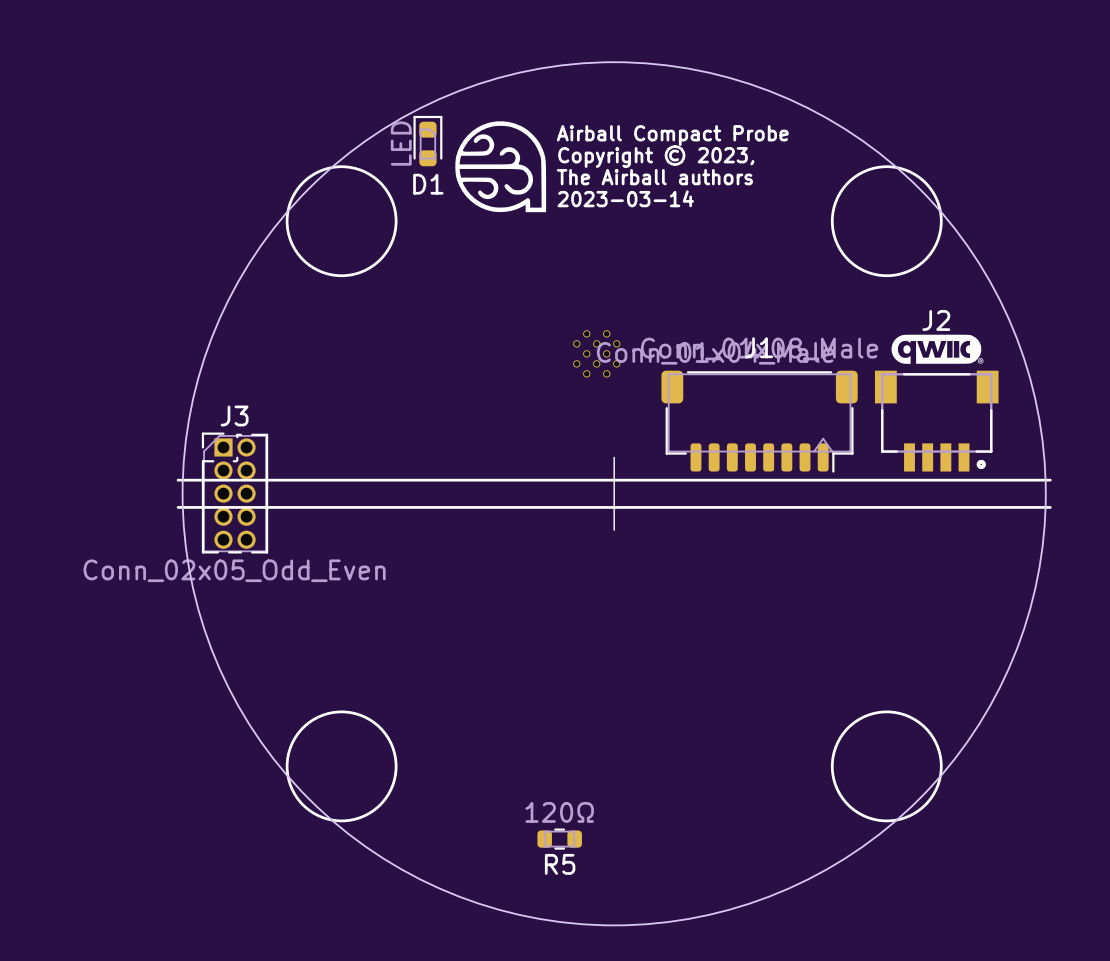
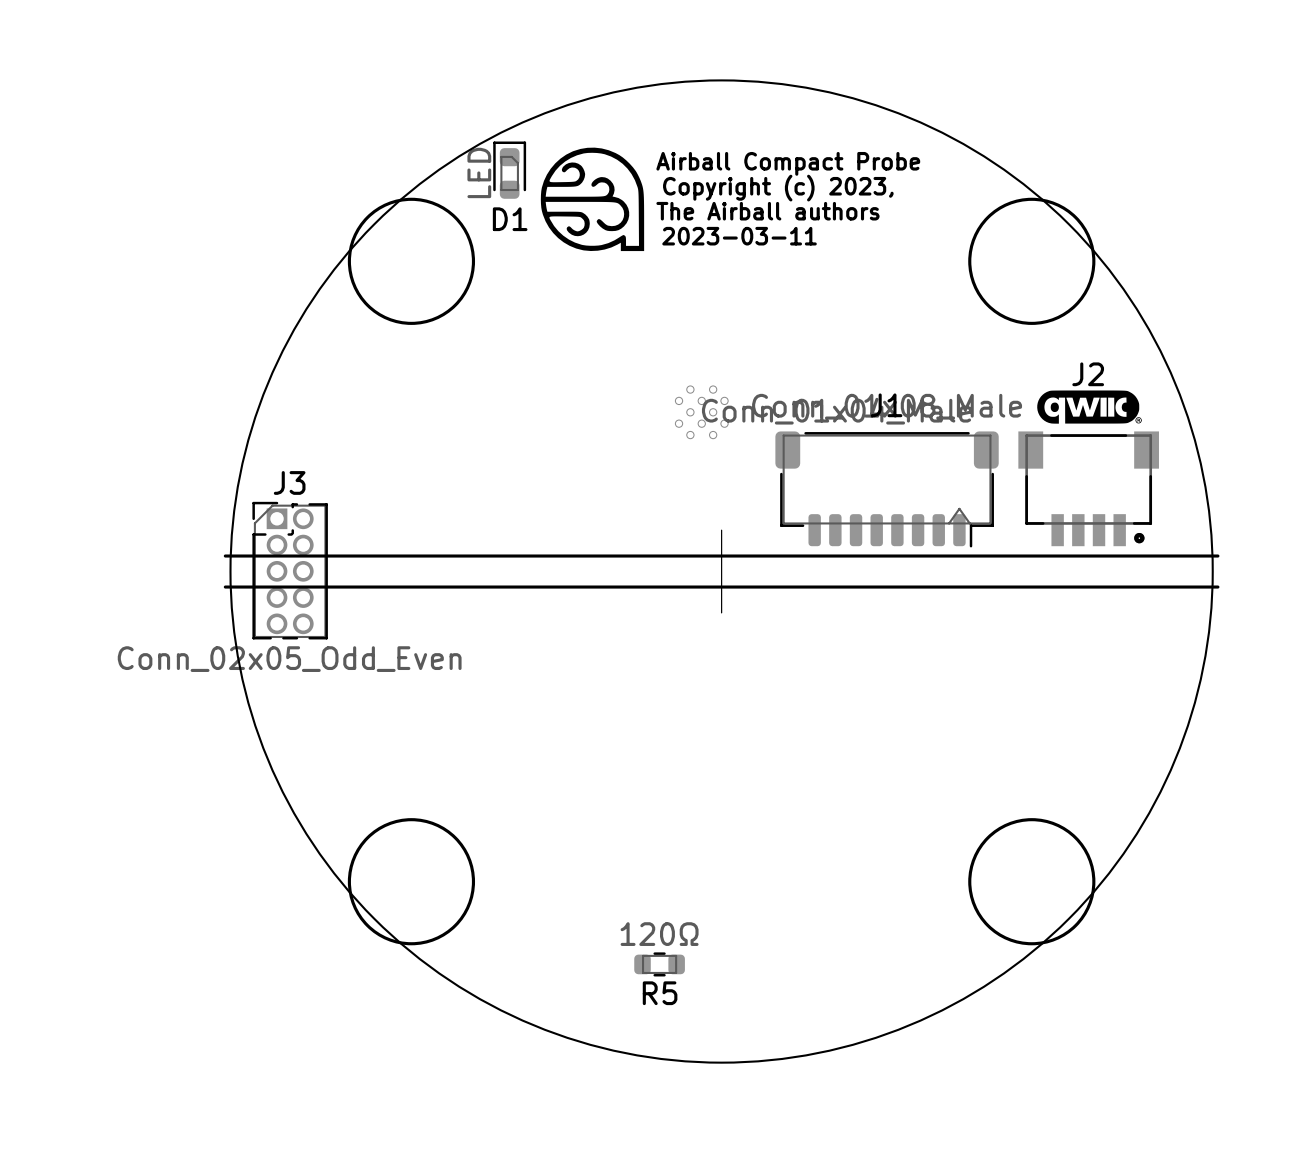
text: Copyright © 2023, (656, 156) -> Copyright (c) 2023, (778, 188)
text: 2023-03-14 (625, 198) -> 2023-03-11 (739, 236)

